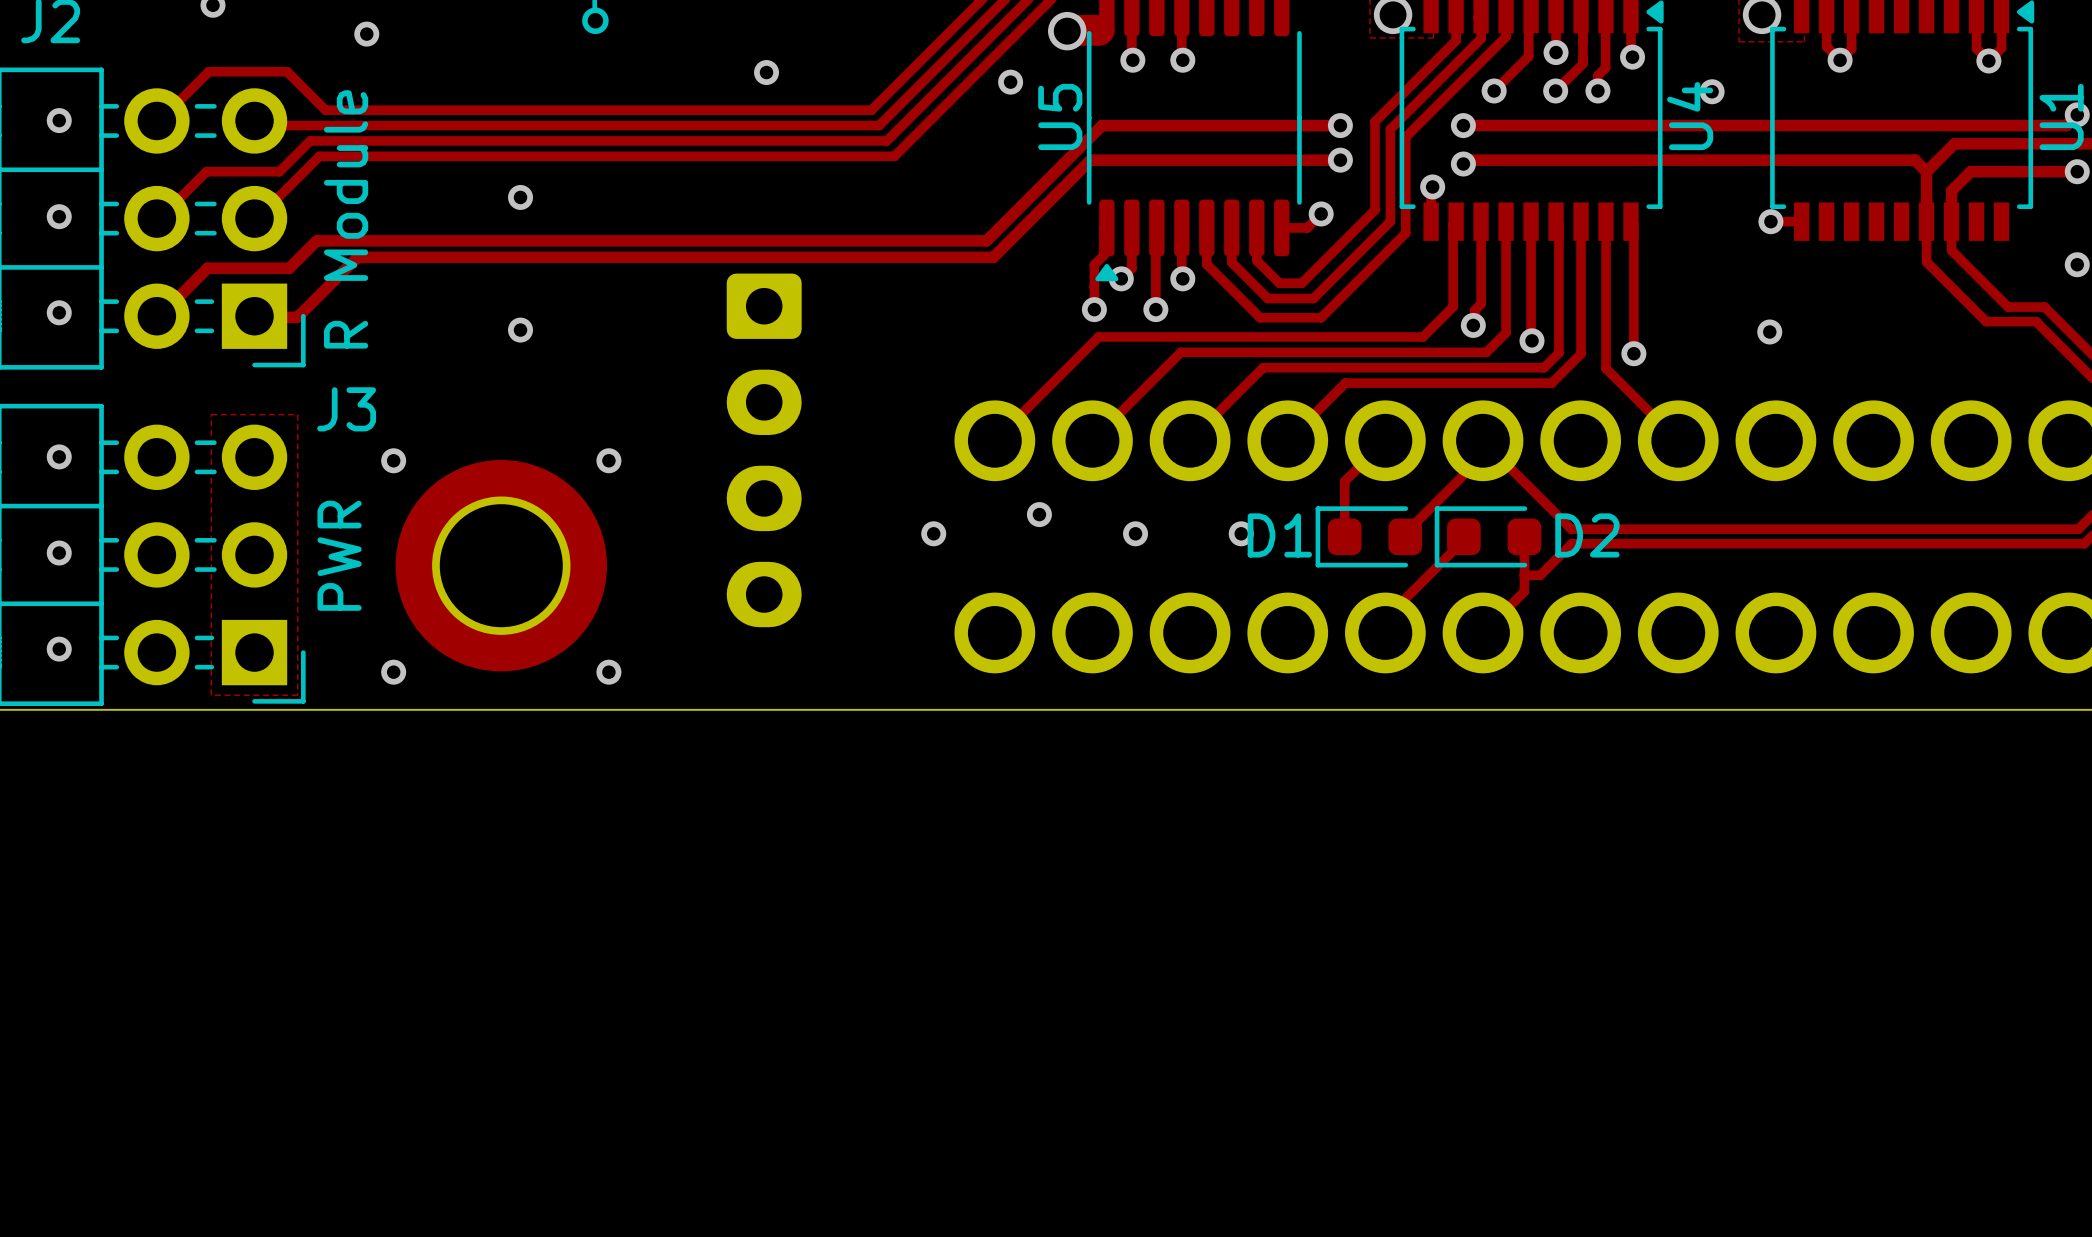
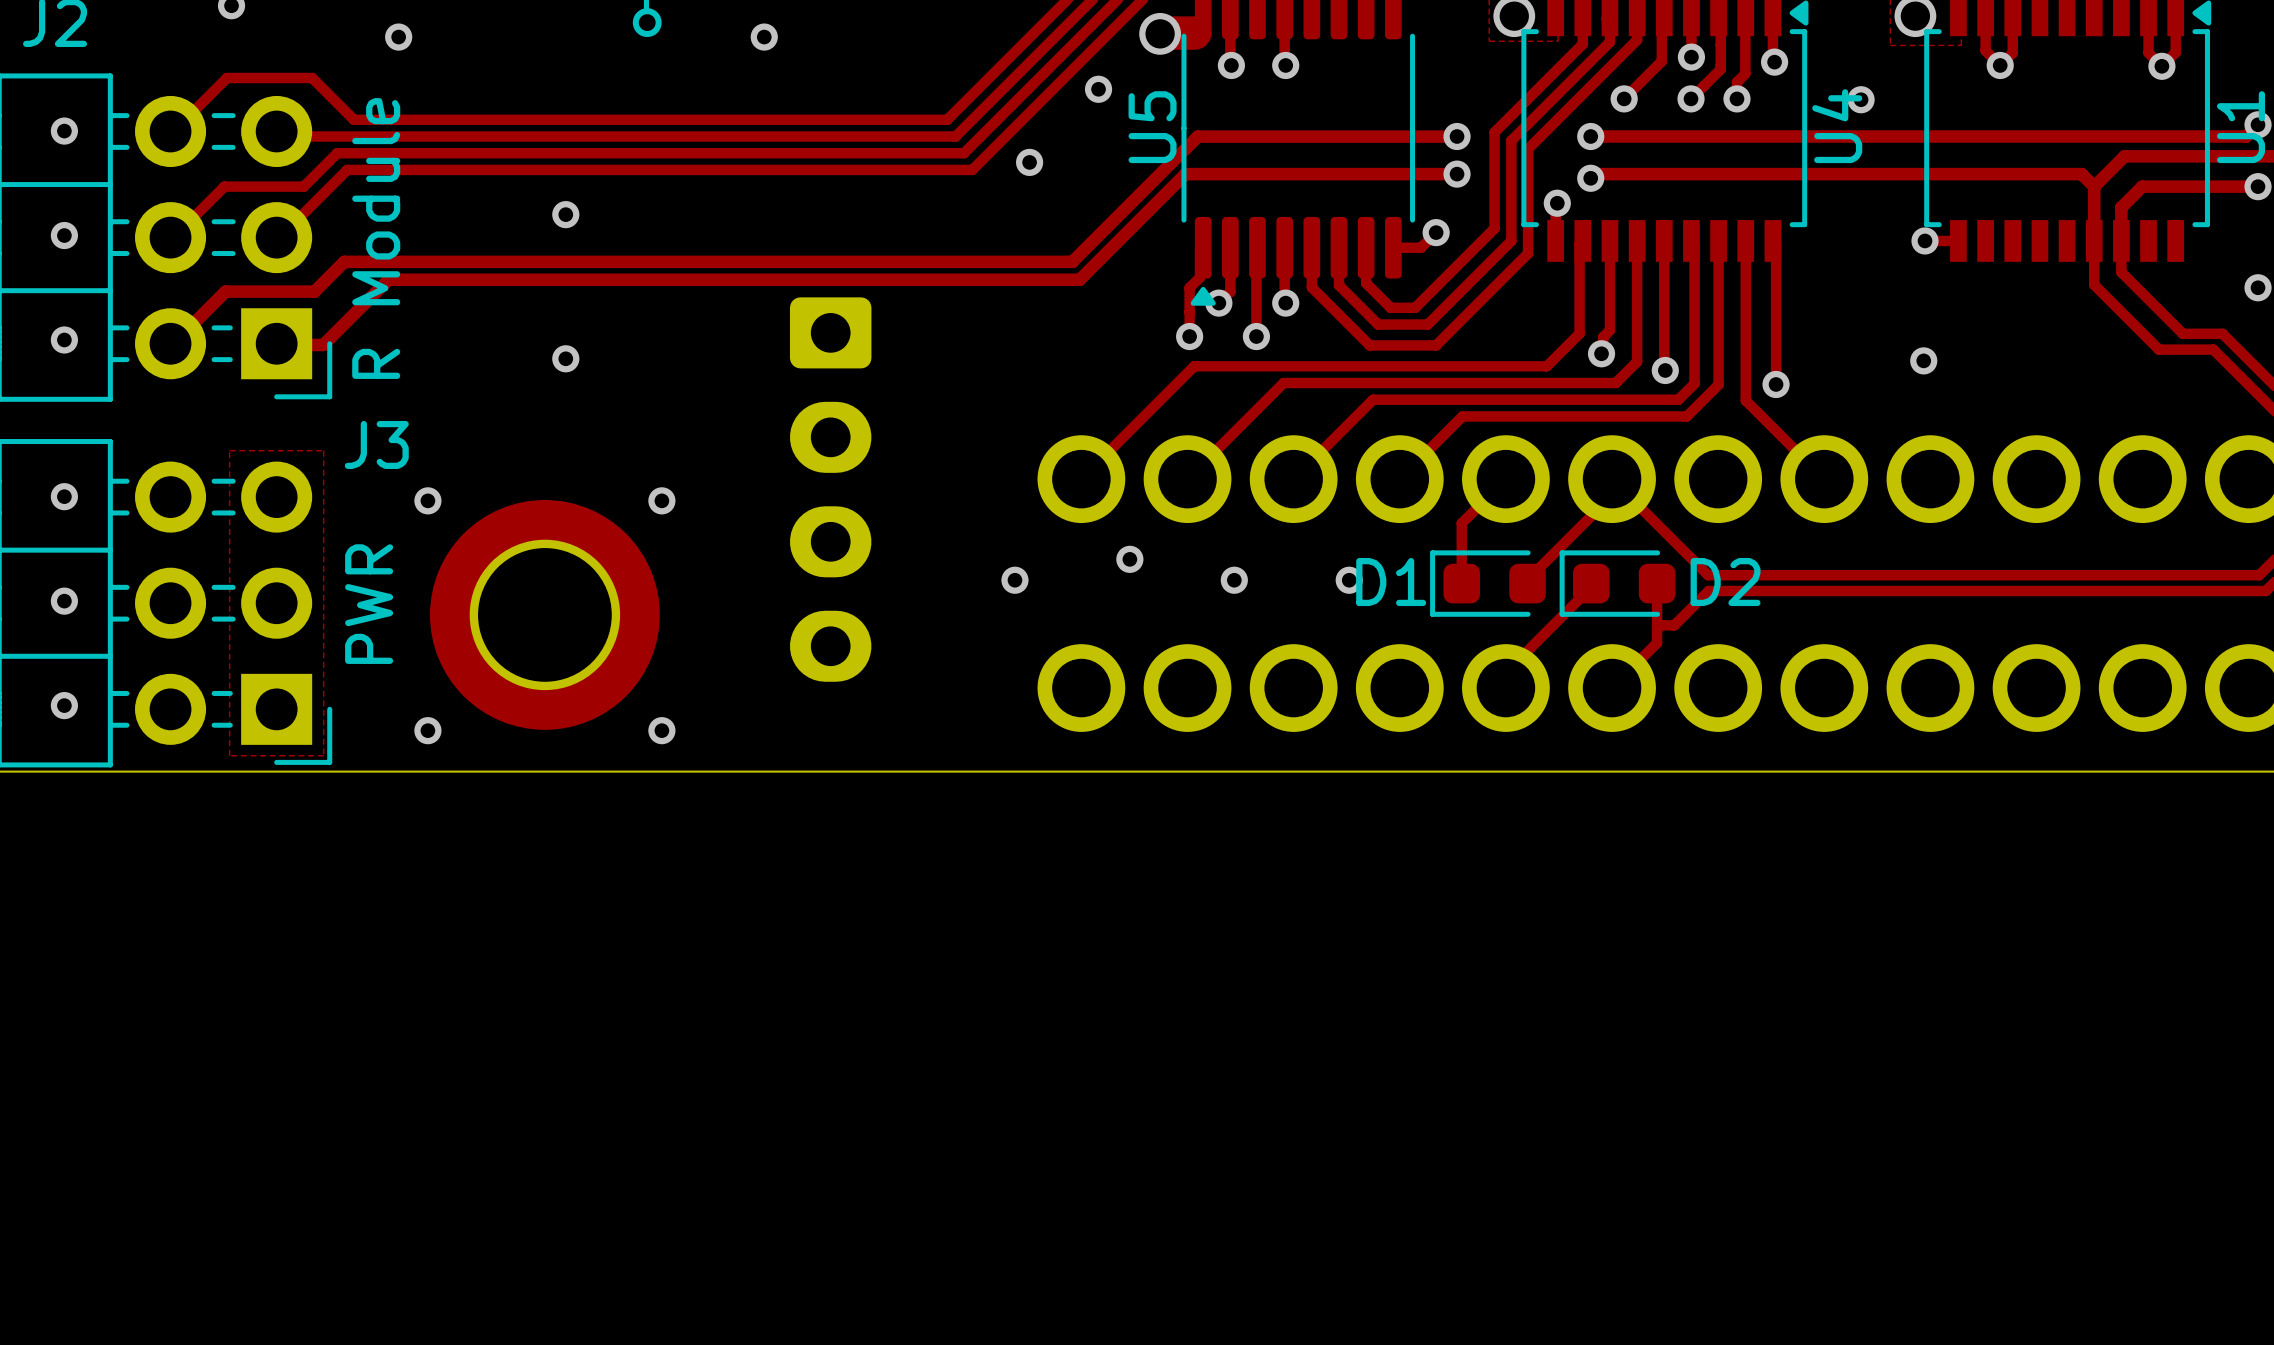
via: none -> (764, 37)
via: (766, 72) -> none
via: none -> (1029, 162)

